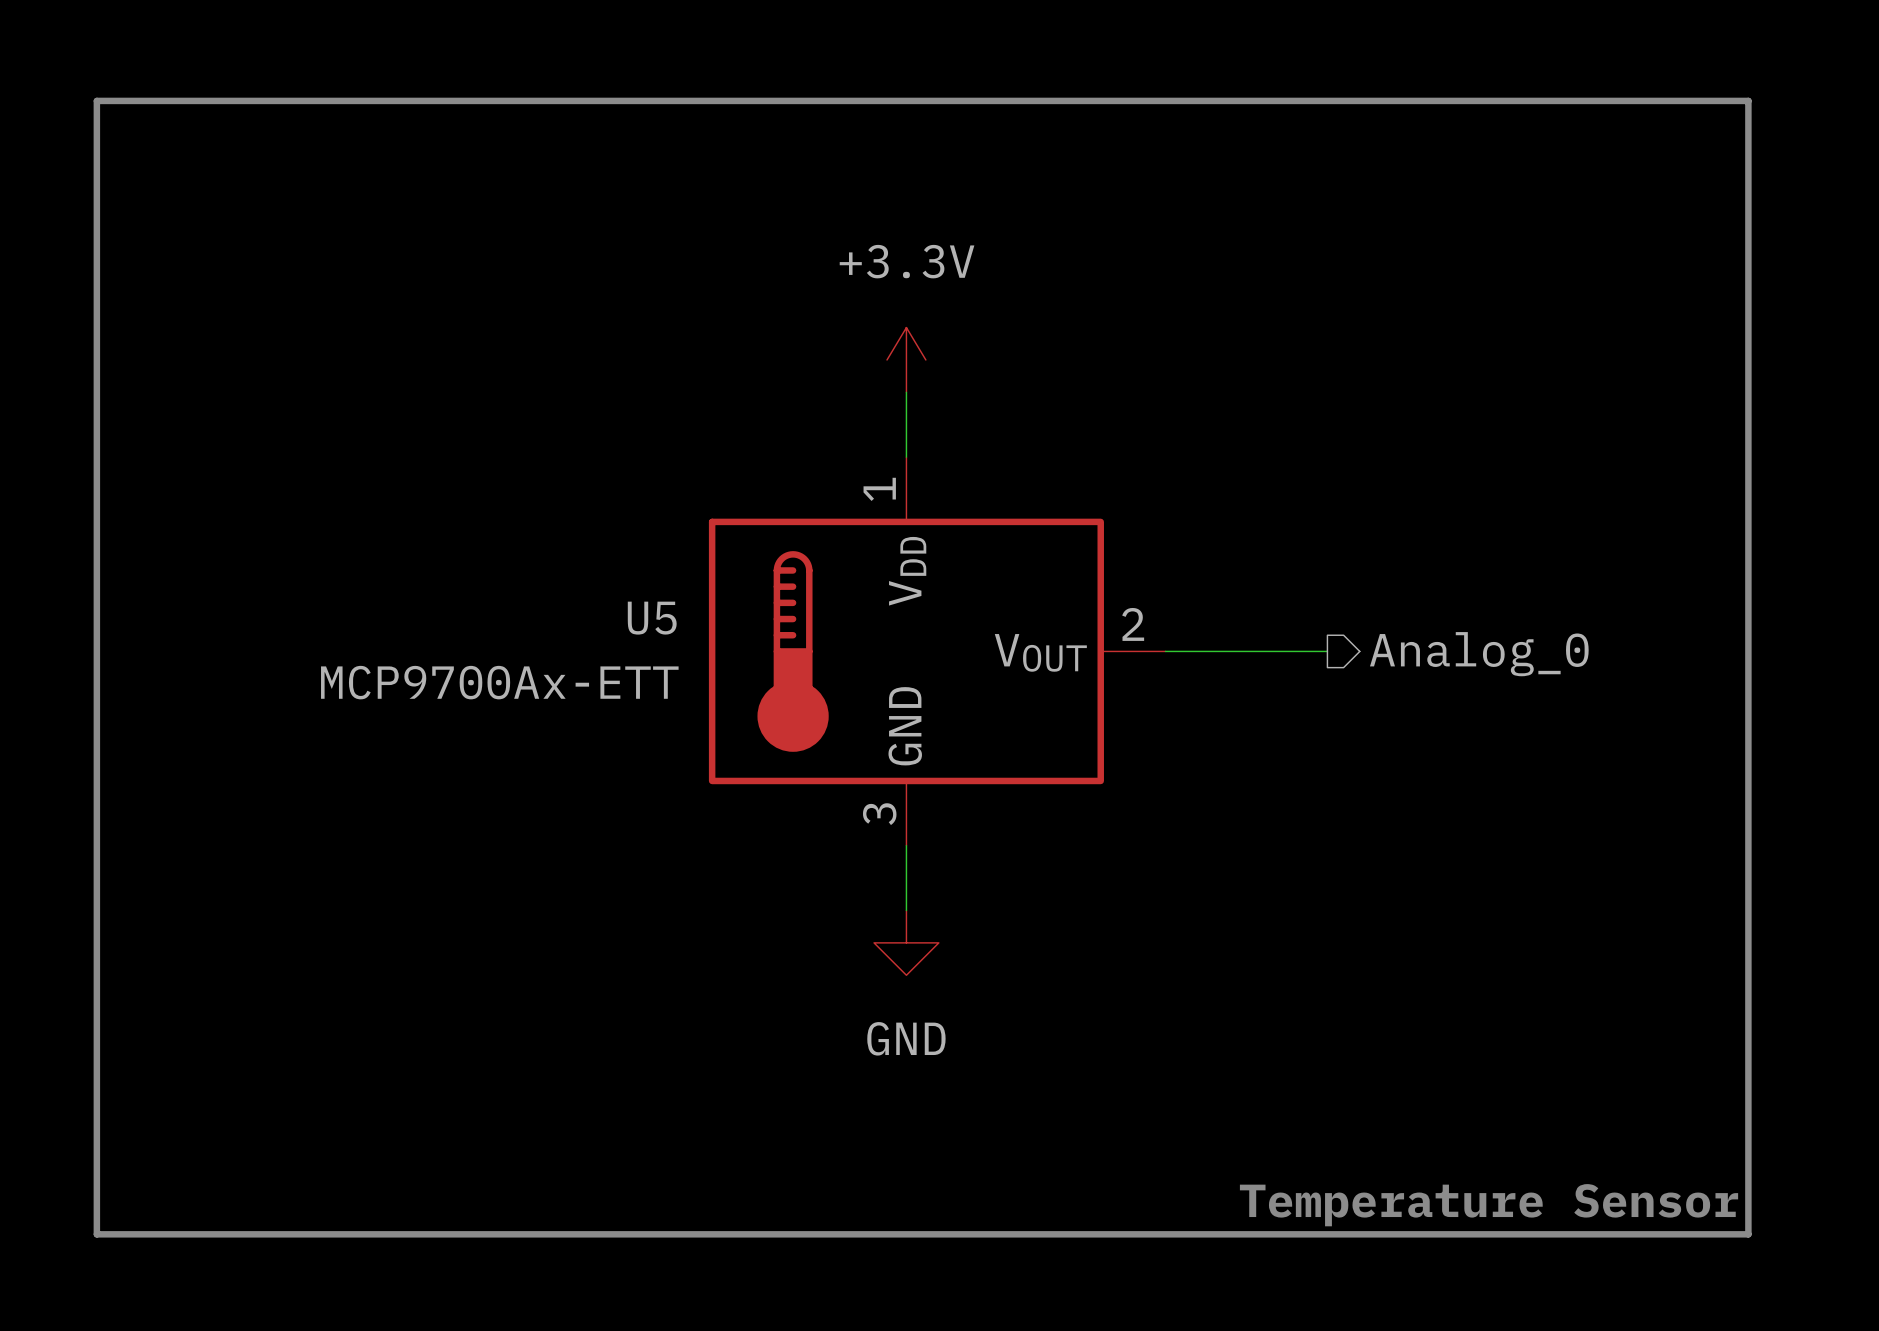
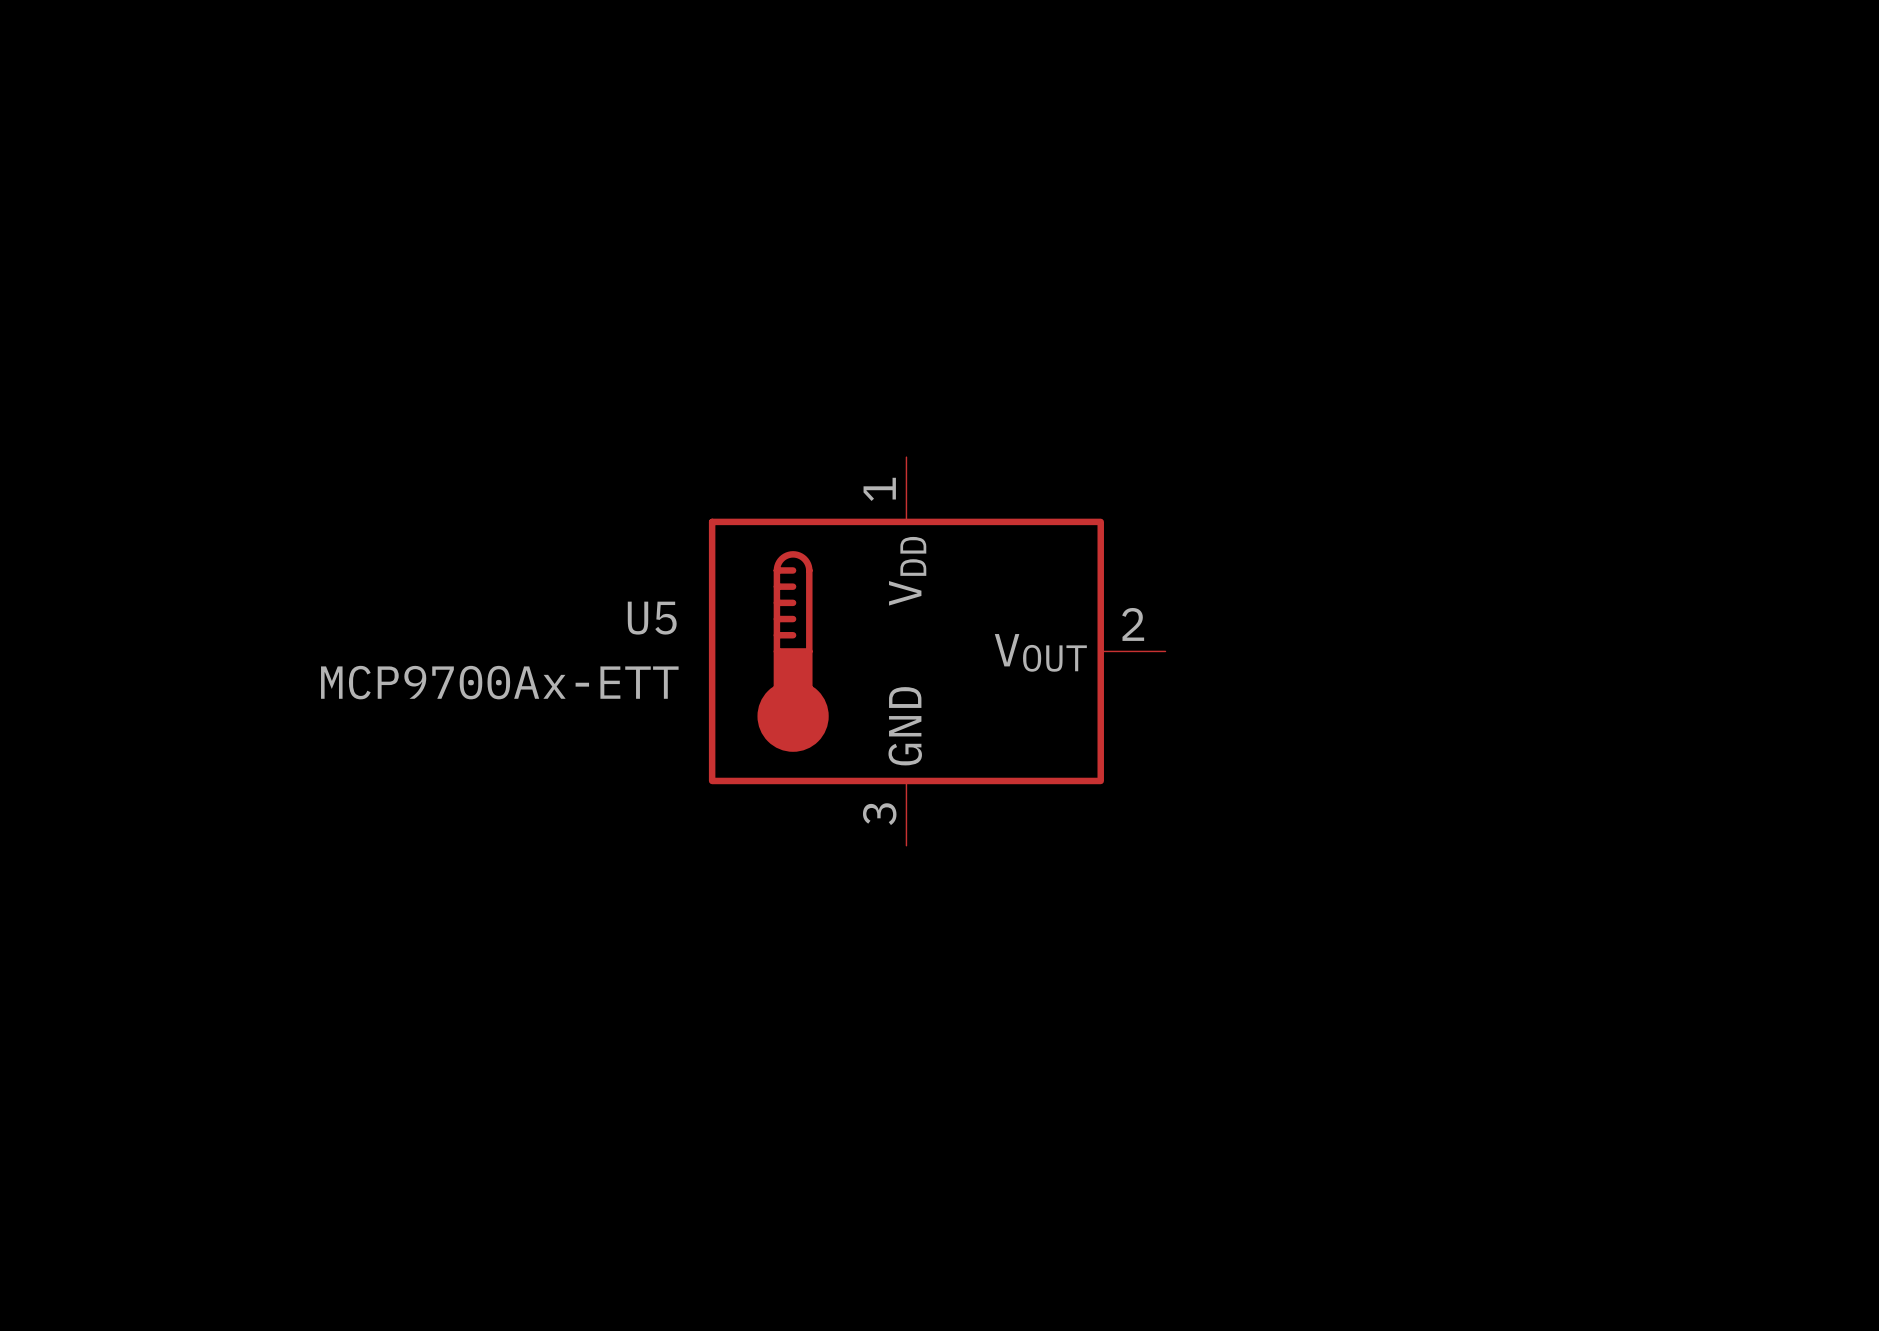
line: (96, 100) (1748, 100) (1748, 1234) (96, 1234) (96, 100) -> none
power symbol: +3.3V (906, 359) -> none
wire: (906, 392) (906, 457) -> none
wire: (1165, 651) (1327, 651) -> none
hierarchical label: Analog_0 (1479, 654) -> none
wire: (906, 845) (906, 910) -> none
power symbol: GND (906, 942) -> none
text: Temperature Sensor (1489, 1205) -> none

